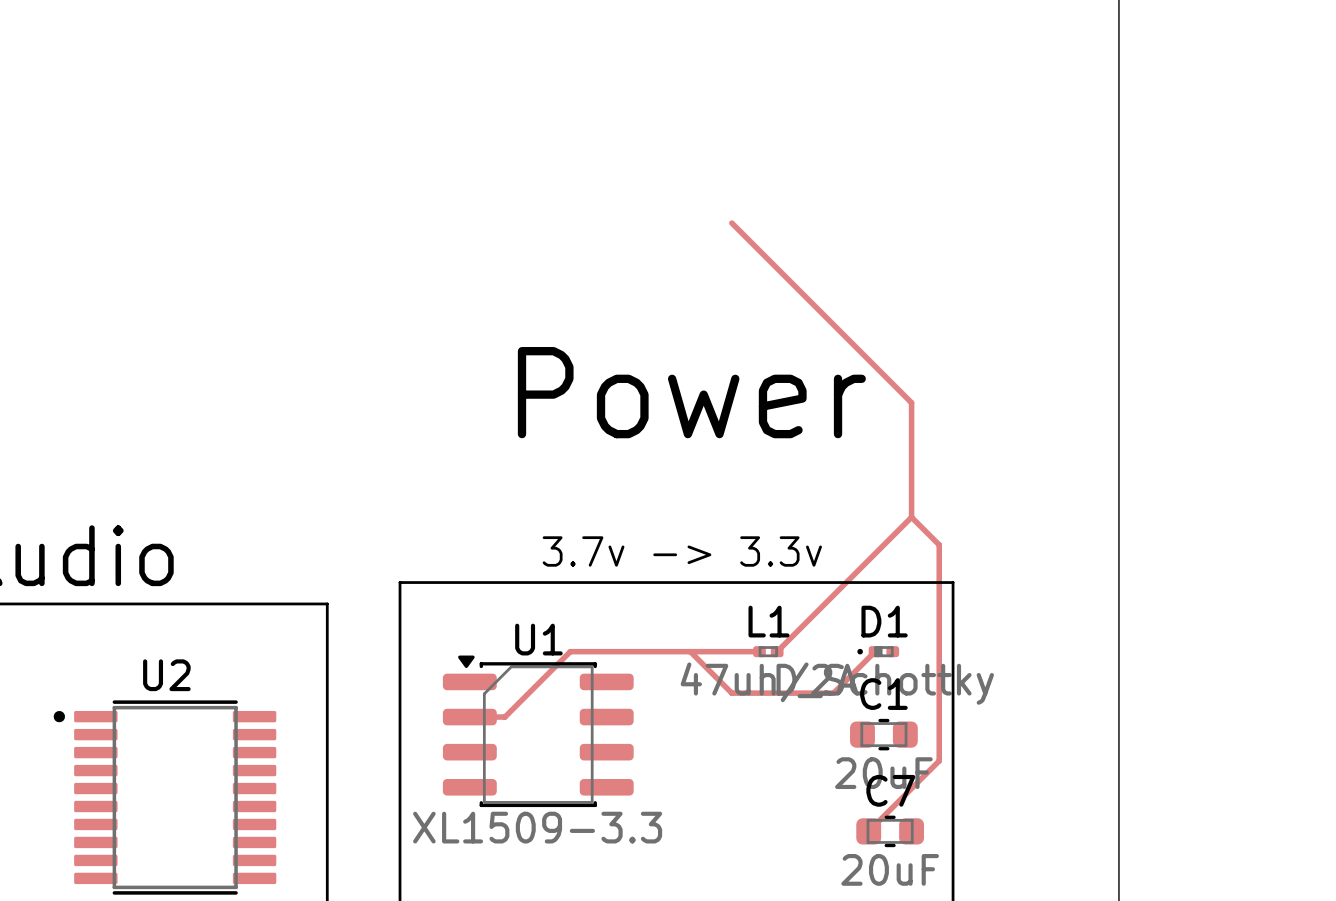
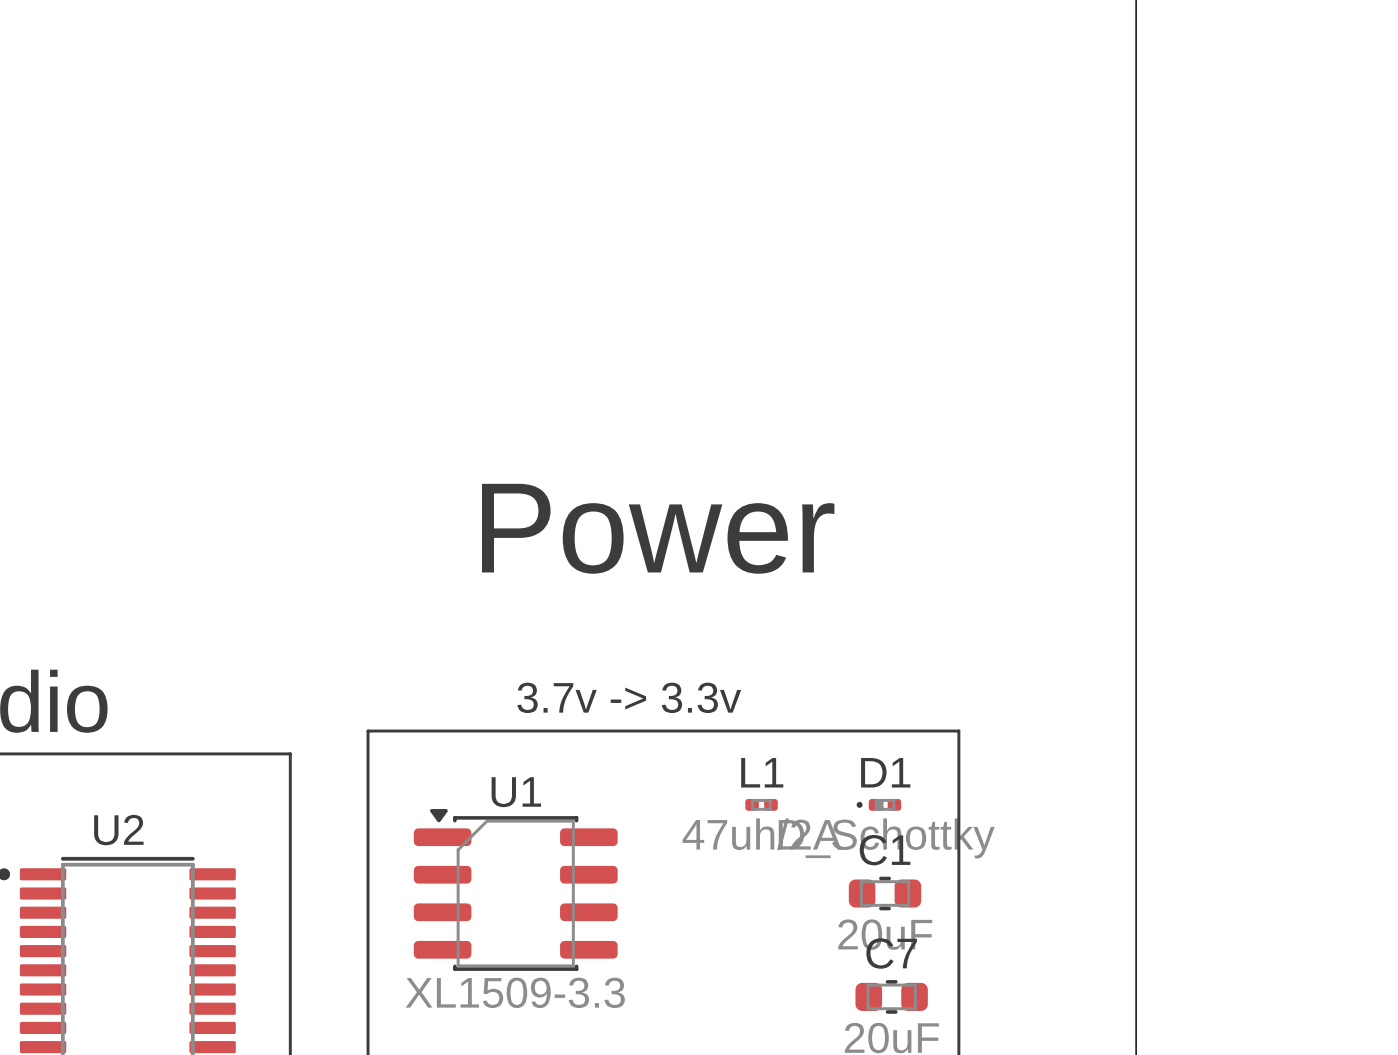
top track: (731, 223) (911, 402) (911, 517) -> none
top track: (911, 517) (777, 651) -> none
top track: (911, 517) (939, 544) (939, 760) (868, 831) -> none
top track: (690, 651) (731, 693) (833, 693) (875, 651) -> none
top track: (759, 651) (570, 651) (504, 717) (469, 717) -> none

